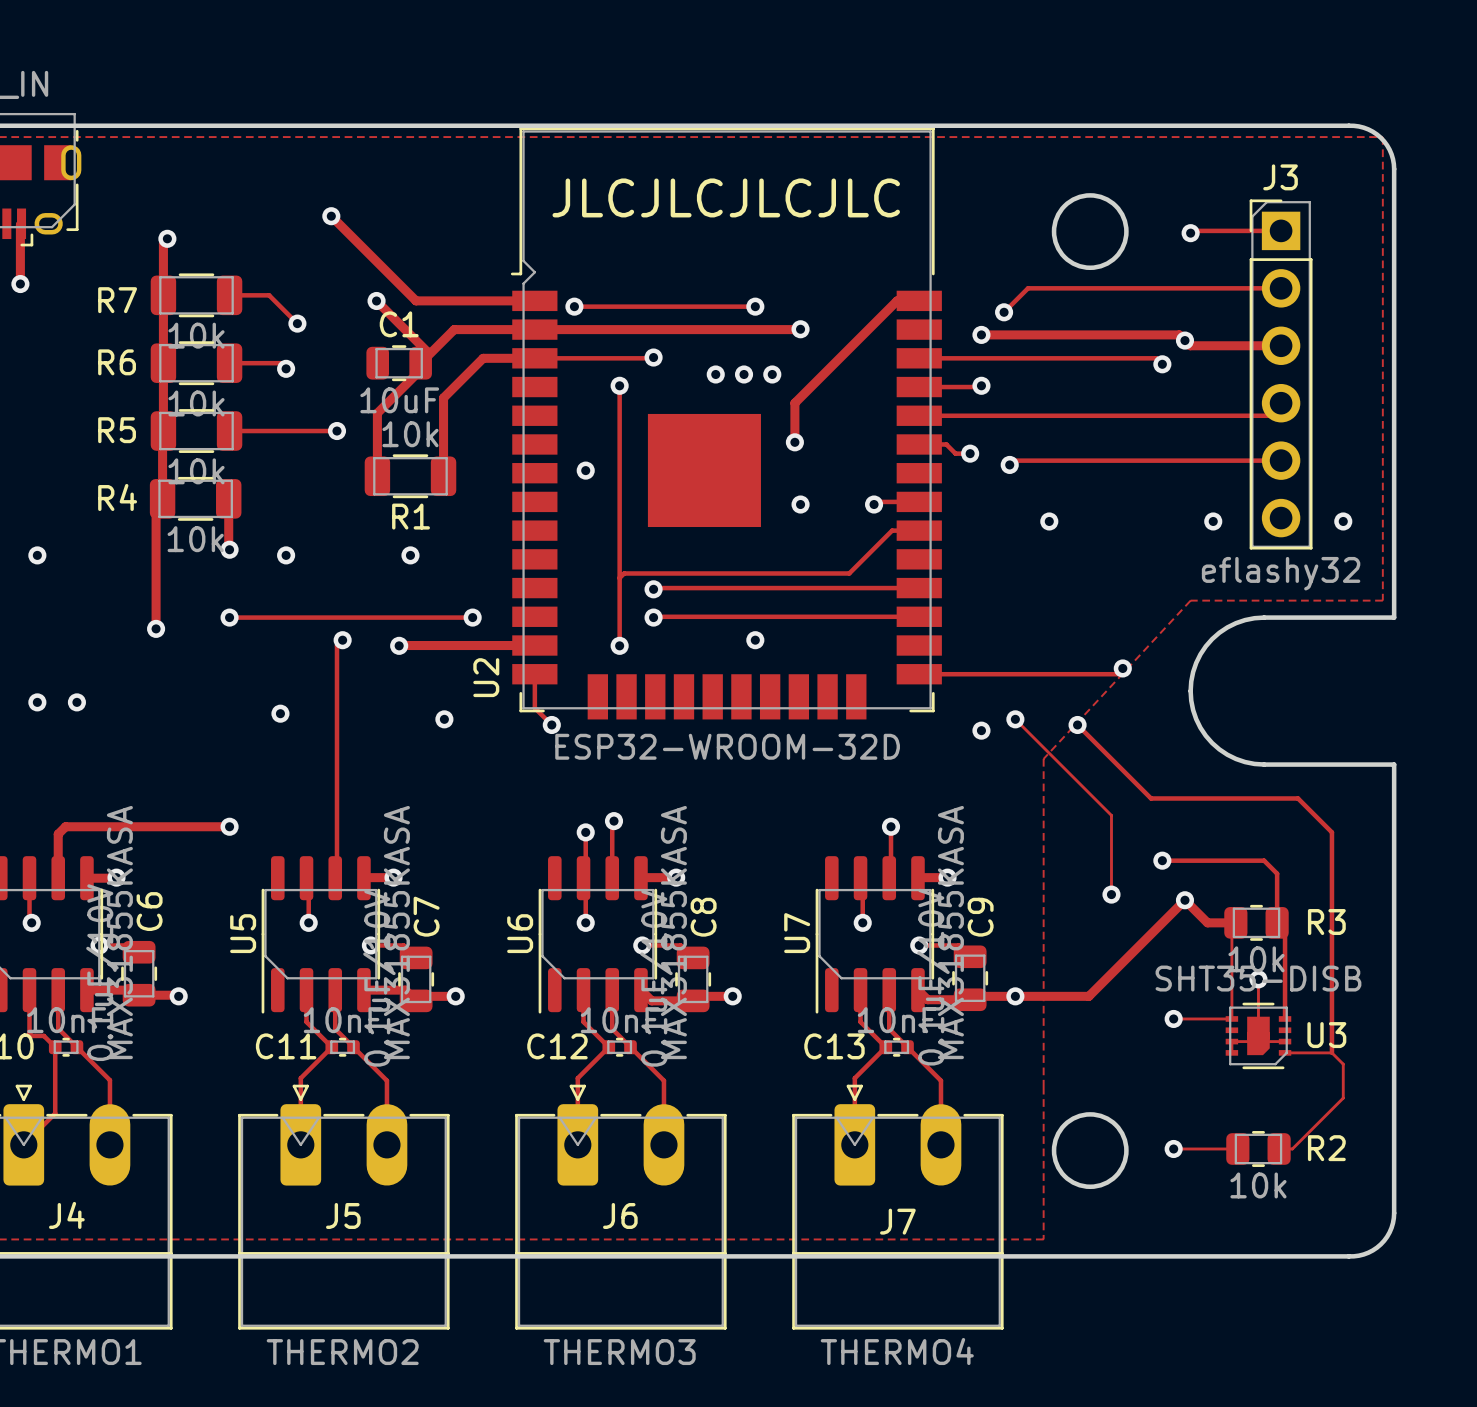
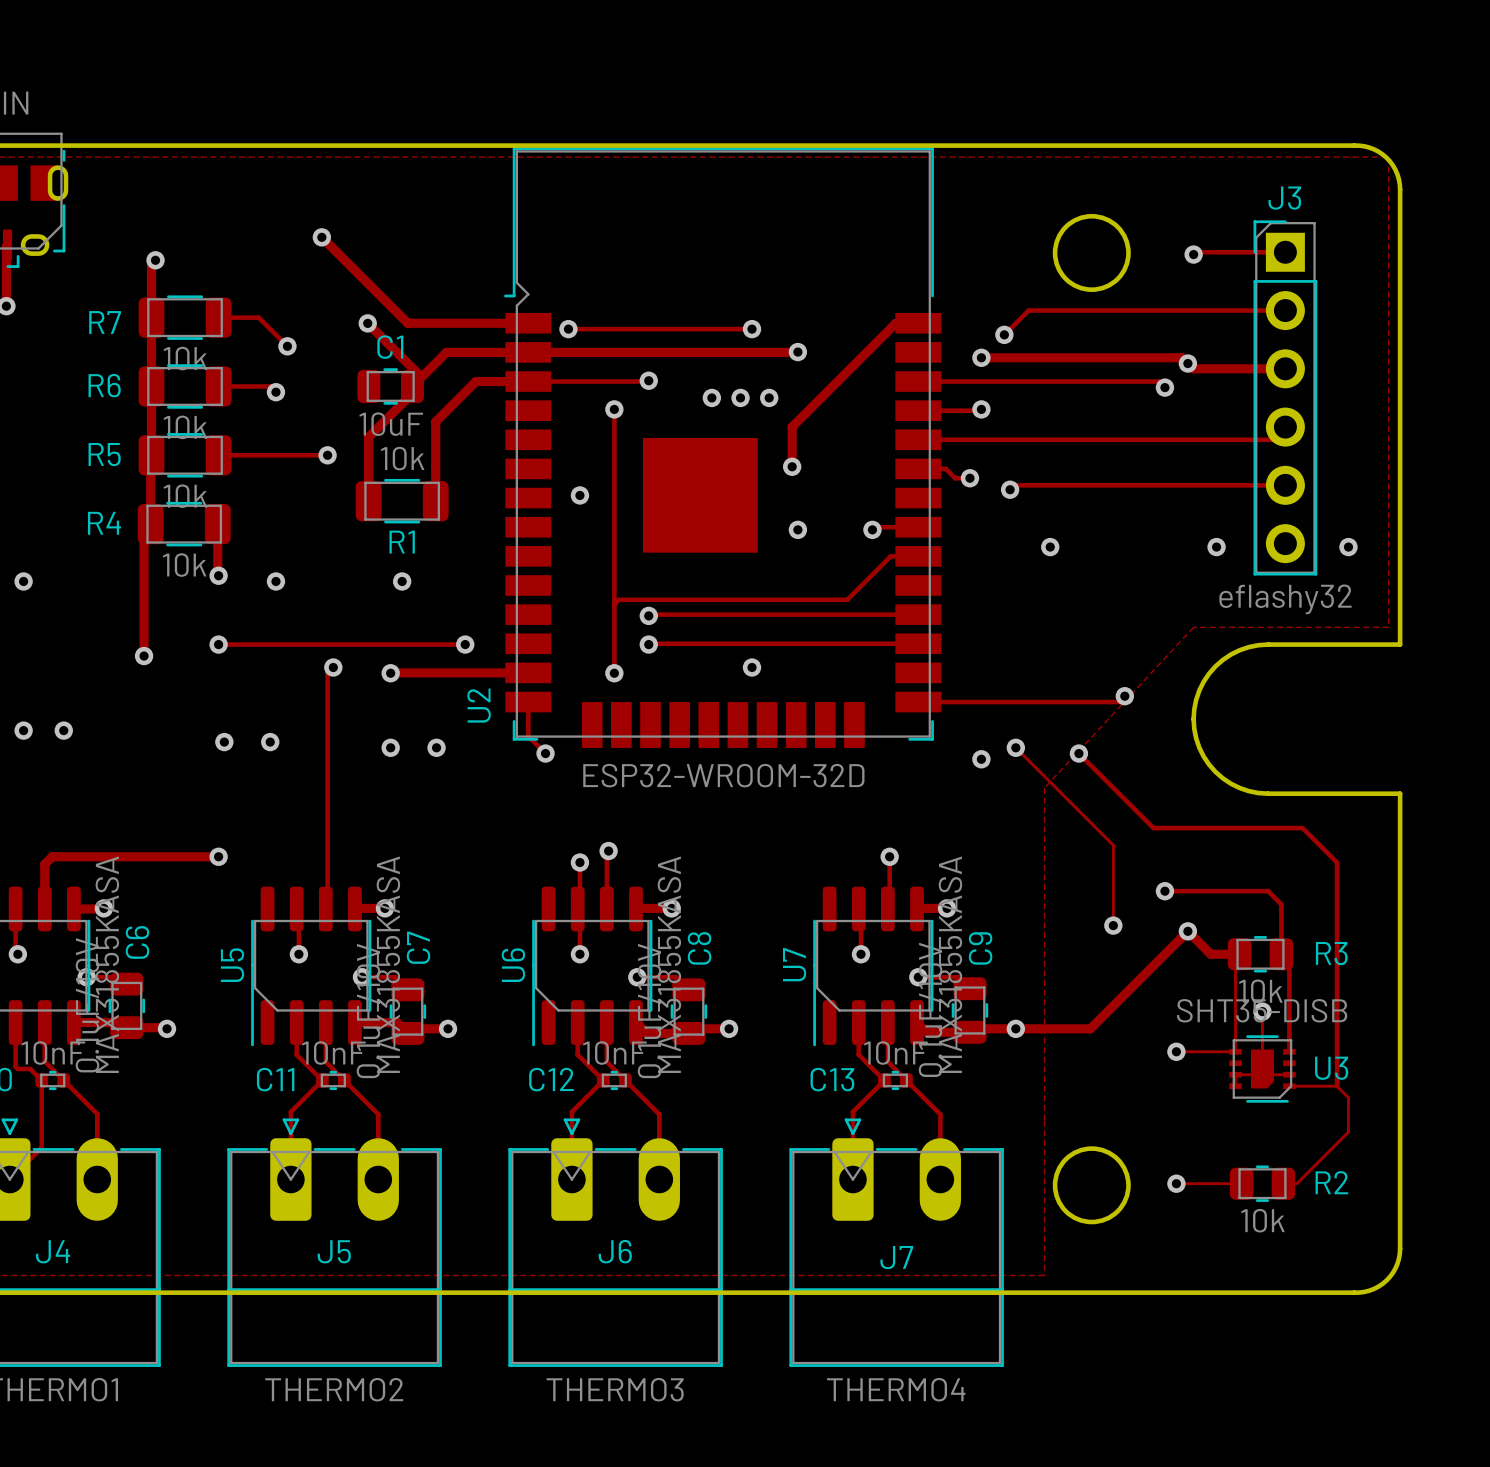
text: JLCJLCJLCJLC (726, 197) -> none
via: none -> (224, 742)
via: none -> (390, 747)

